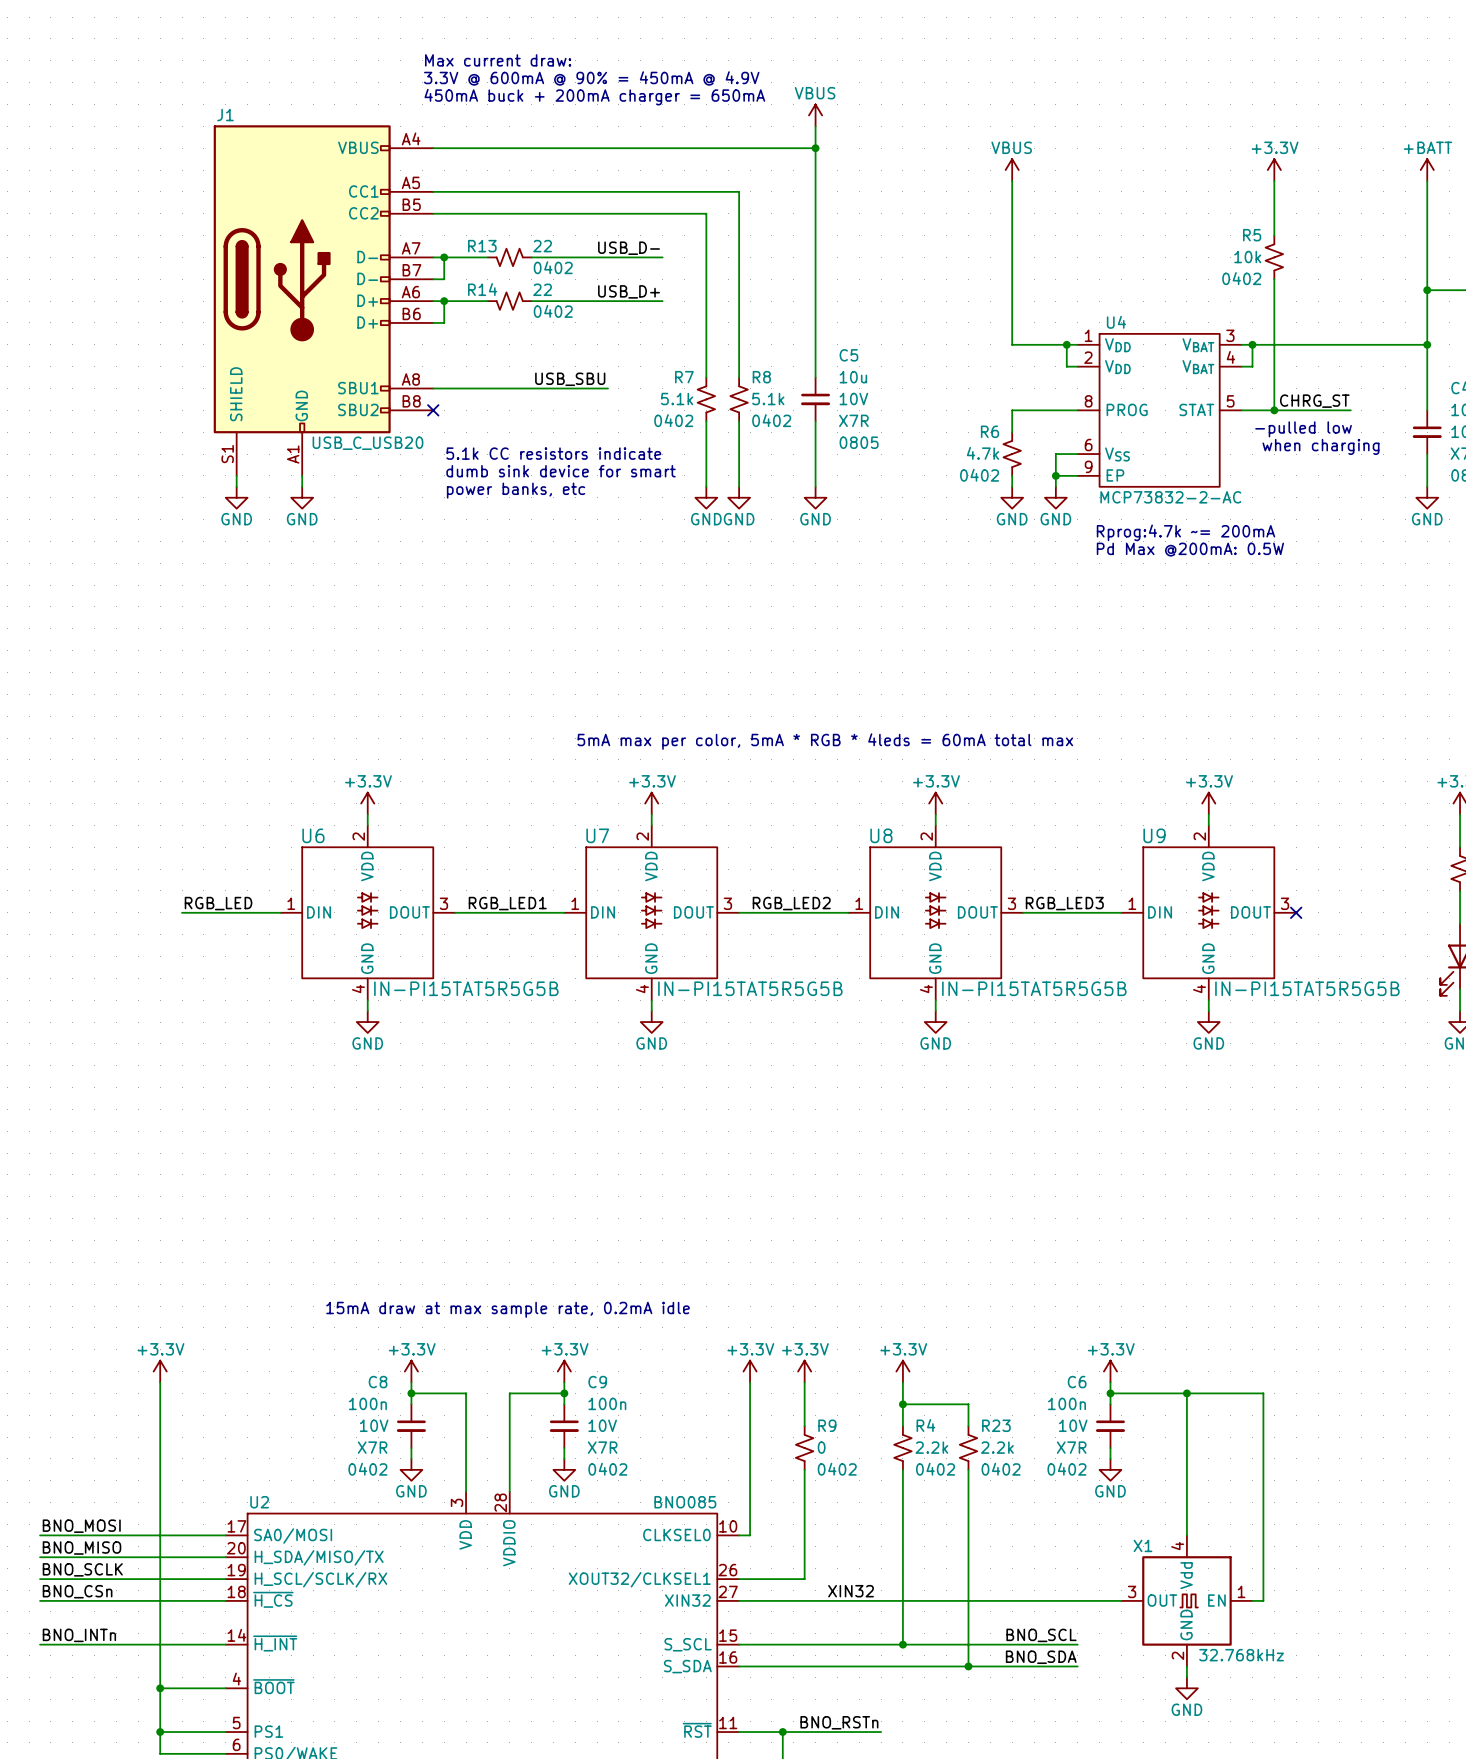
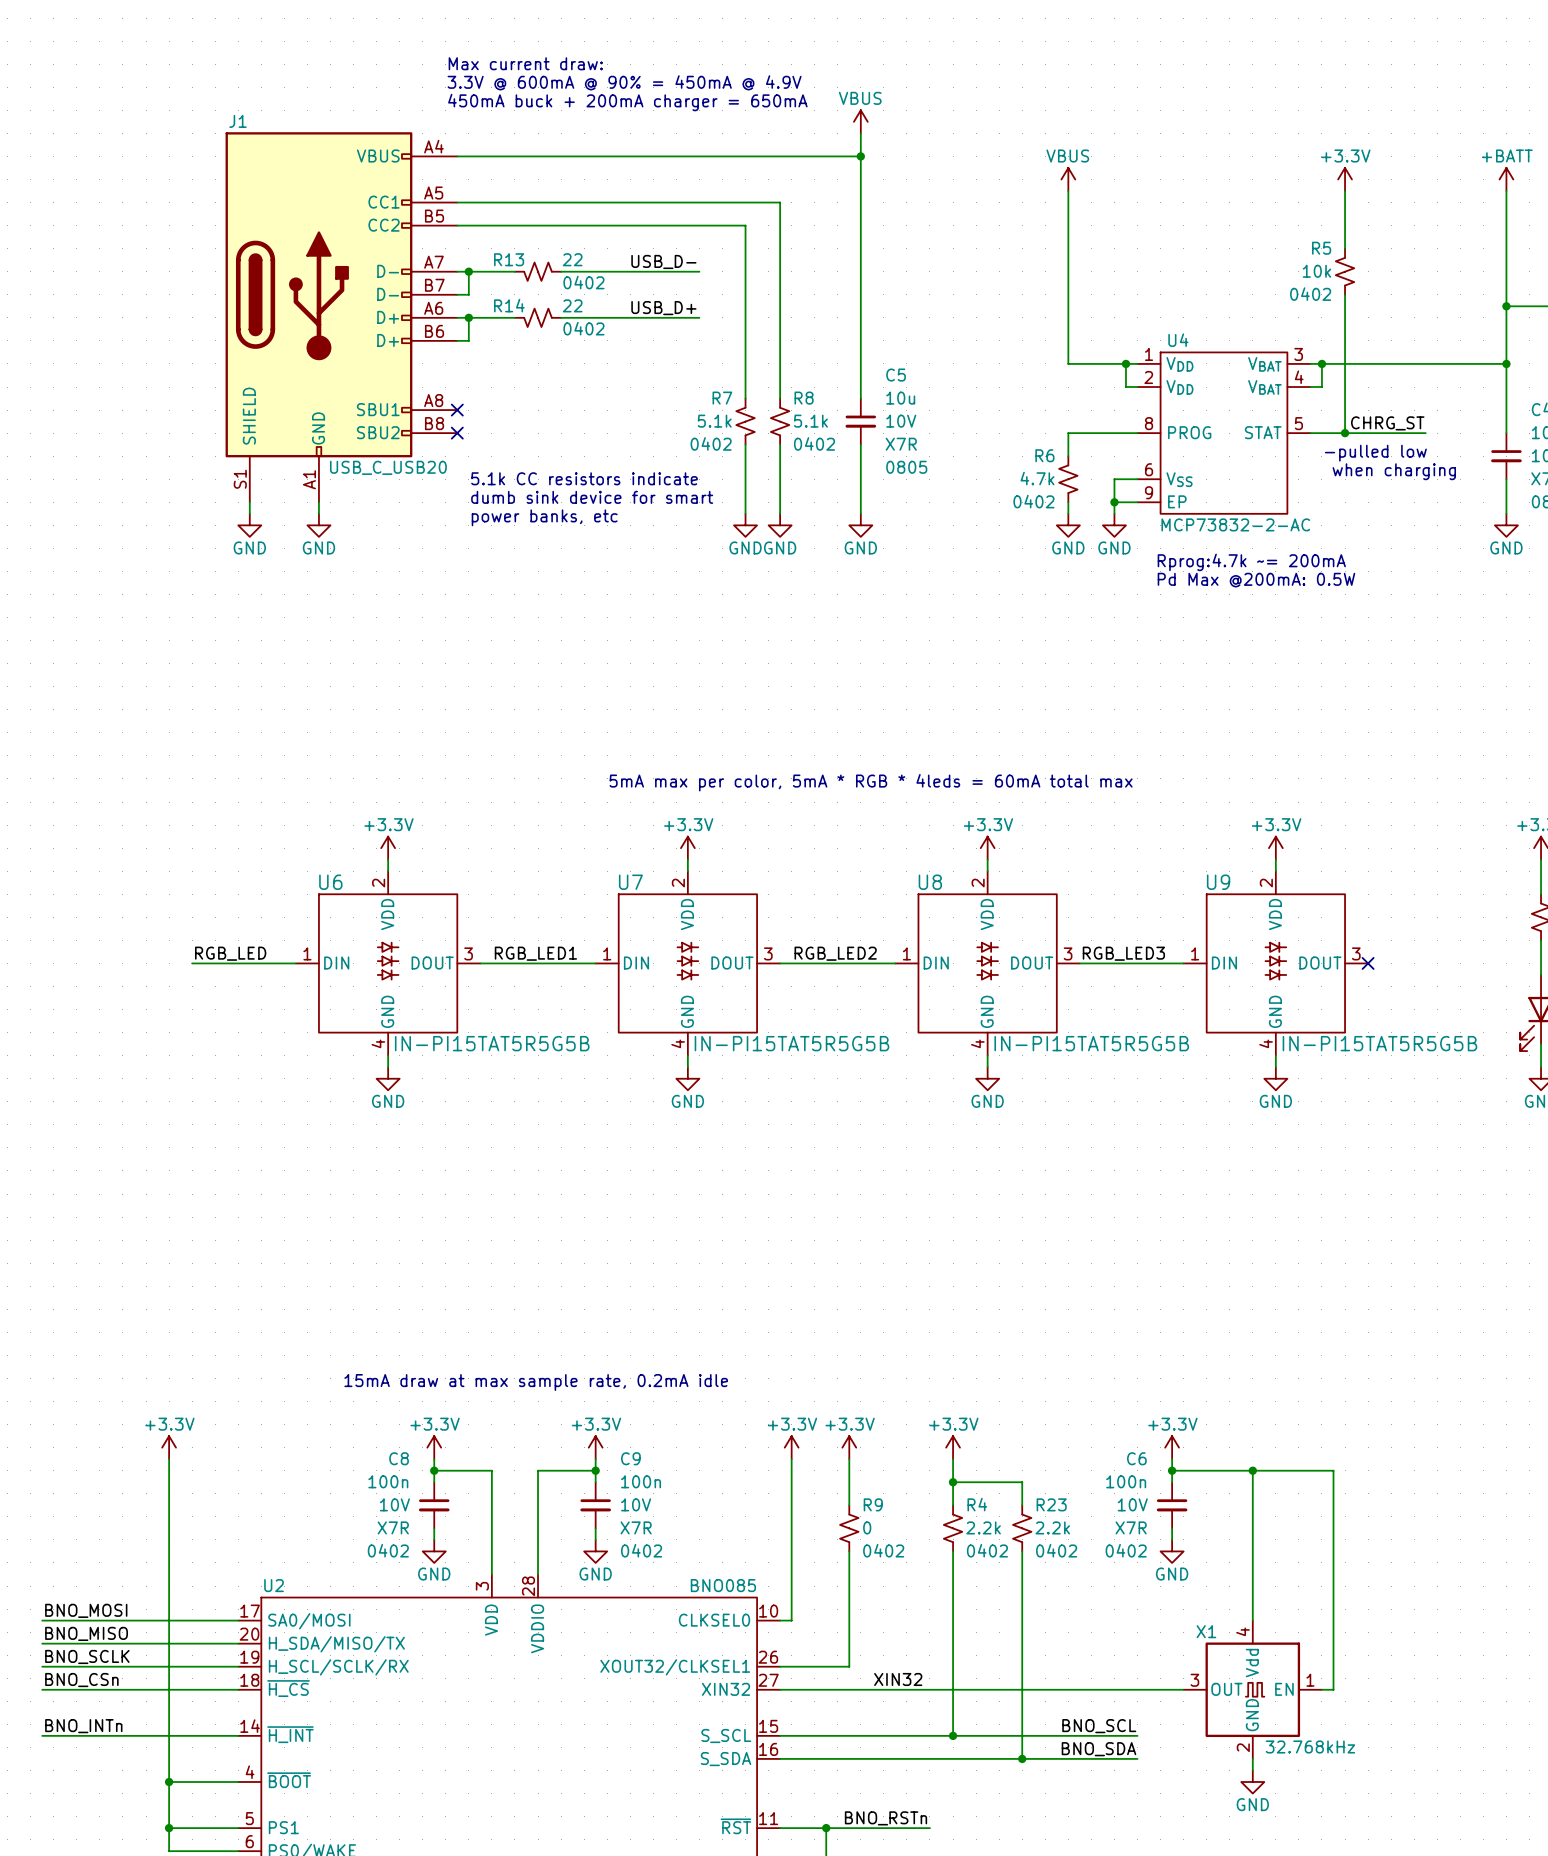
label: USB_SBU (570, 379) -> none
wire: (433, 388) (608, 388) -> none
no-connect mark: none -> (457, 410)

